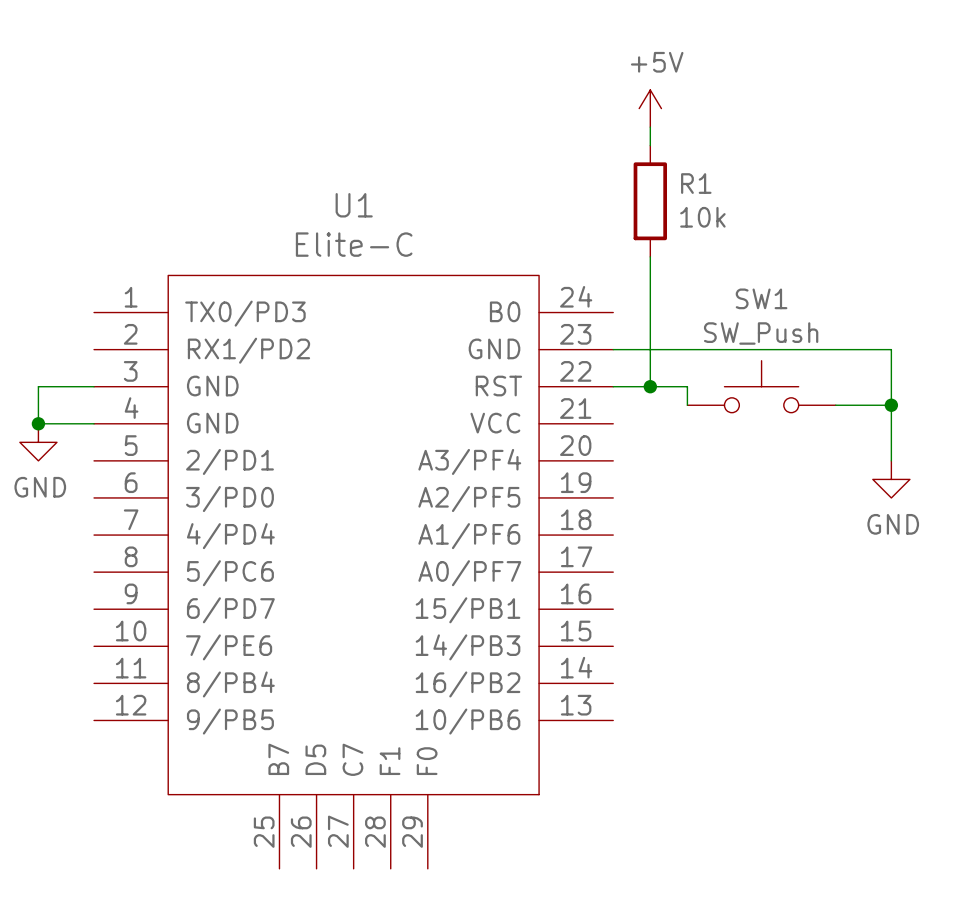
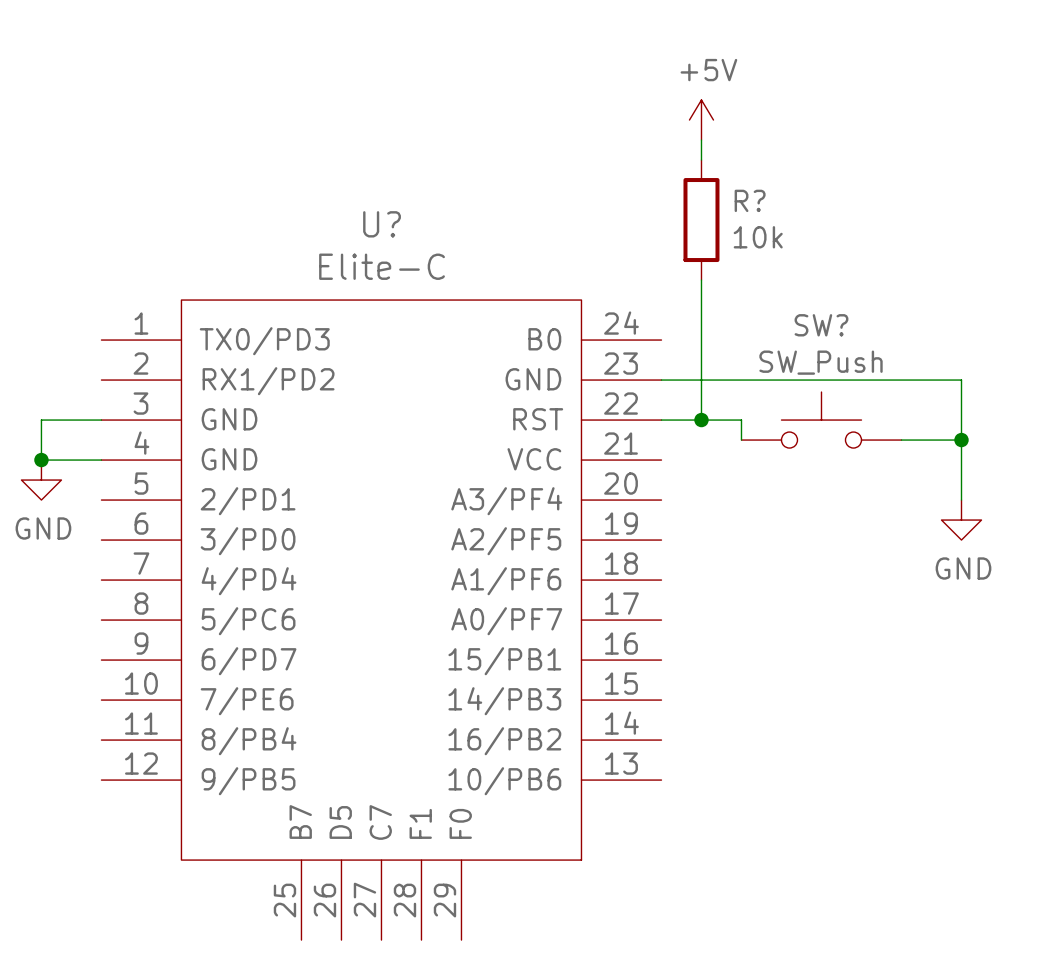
R1 name: R1 (696, 183) -> R? (750, 200)
U1 name: U1 (354, 205) -> U? (382, 224)
SW1 name: SW1 (761, 298) -> SW? (821, 325)

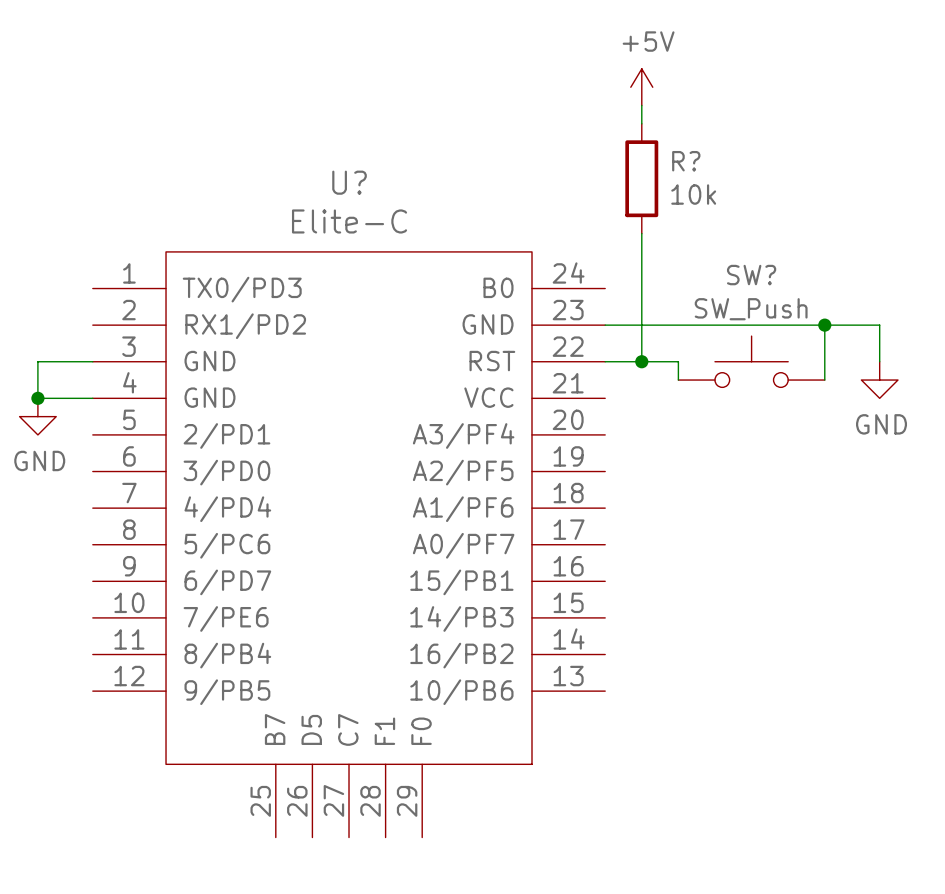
wire: (961, 420) (961, 500) -> none
wire: (901, 440) (961, 440) -> (824, 380) (824, 325)
junction position: (961, 440) -> (824, 325)
power symbol position: GND (961, 520) -> GND (879, 380)

